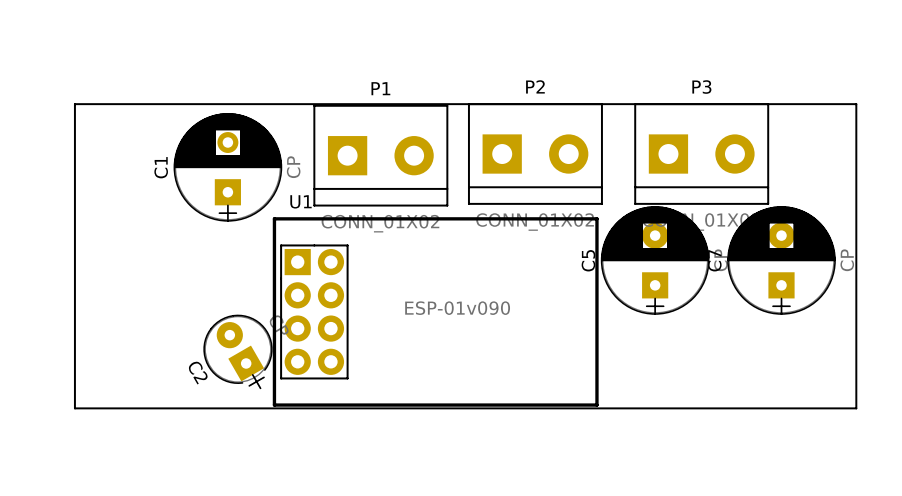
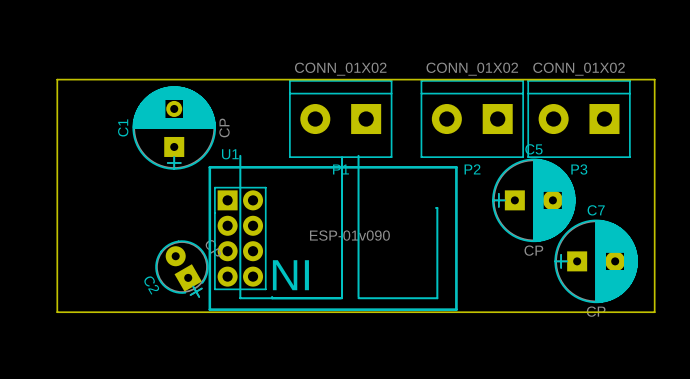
P2 rotation: 0° (535, 154) -> 180° (472, 119)
P2 position: (535, 154) -> (472, 119)
P3 rotation: 0° (701, 154) -> 180° (579, 119)
P1 rotation: 0° (380, 155) -> 180° (340, 119)
line: none -> (240, 155) (240, 298) (342, 298) (342, 157)
line: none -> (358, 155) (358, 296)
C5 rotation: 0° (655, 260) -> 90° clockwise (533, 200)
C7 rotation: 0° (781, 260) -> 90° clockwise (596, 261)
C7 position: (781, 260) -> (596, 261)
line: none -> (436, 207) (437, 298) (358, 298)
text: none -> IN (290, 275)
line: none -> (272, 296) (272, 298)

